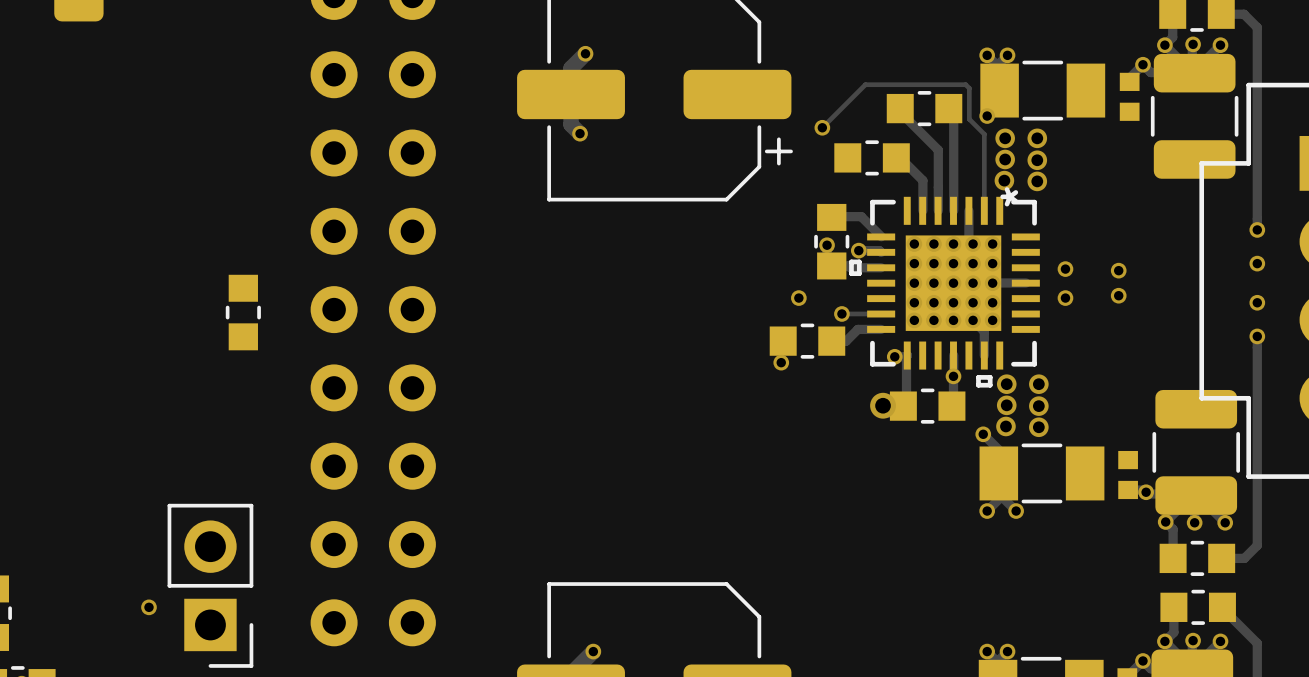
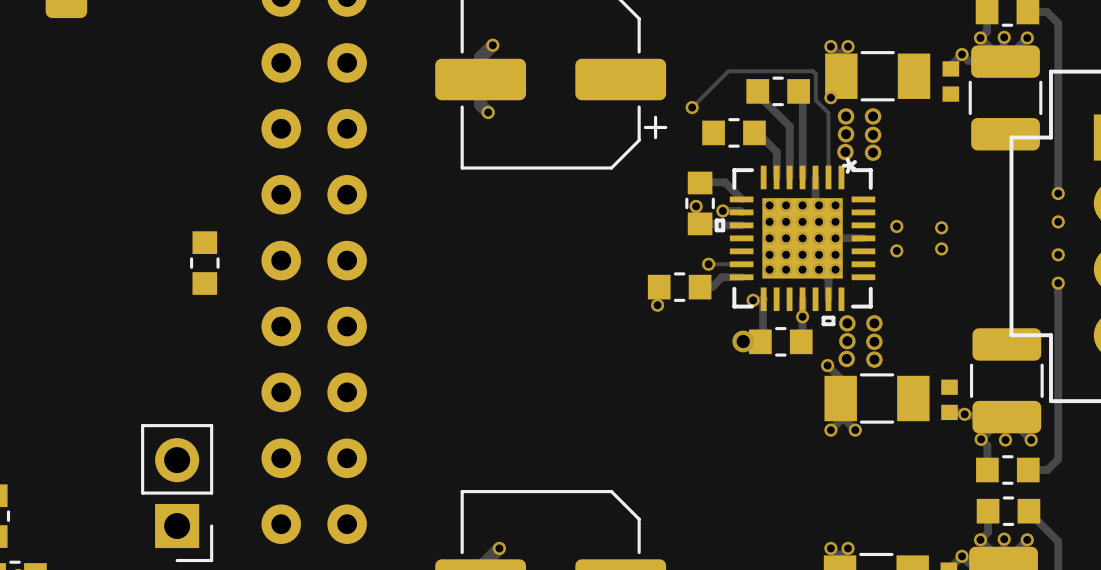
via: (798, 298) -> none
via: (148, 607) -> none

